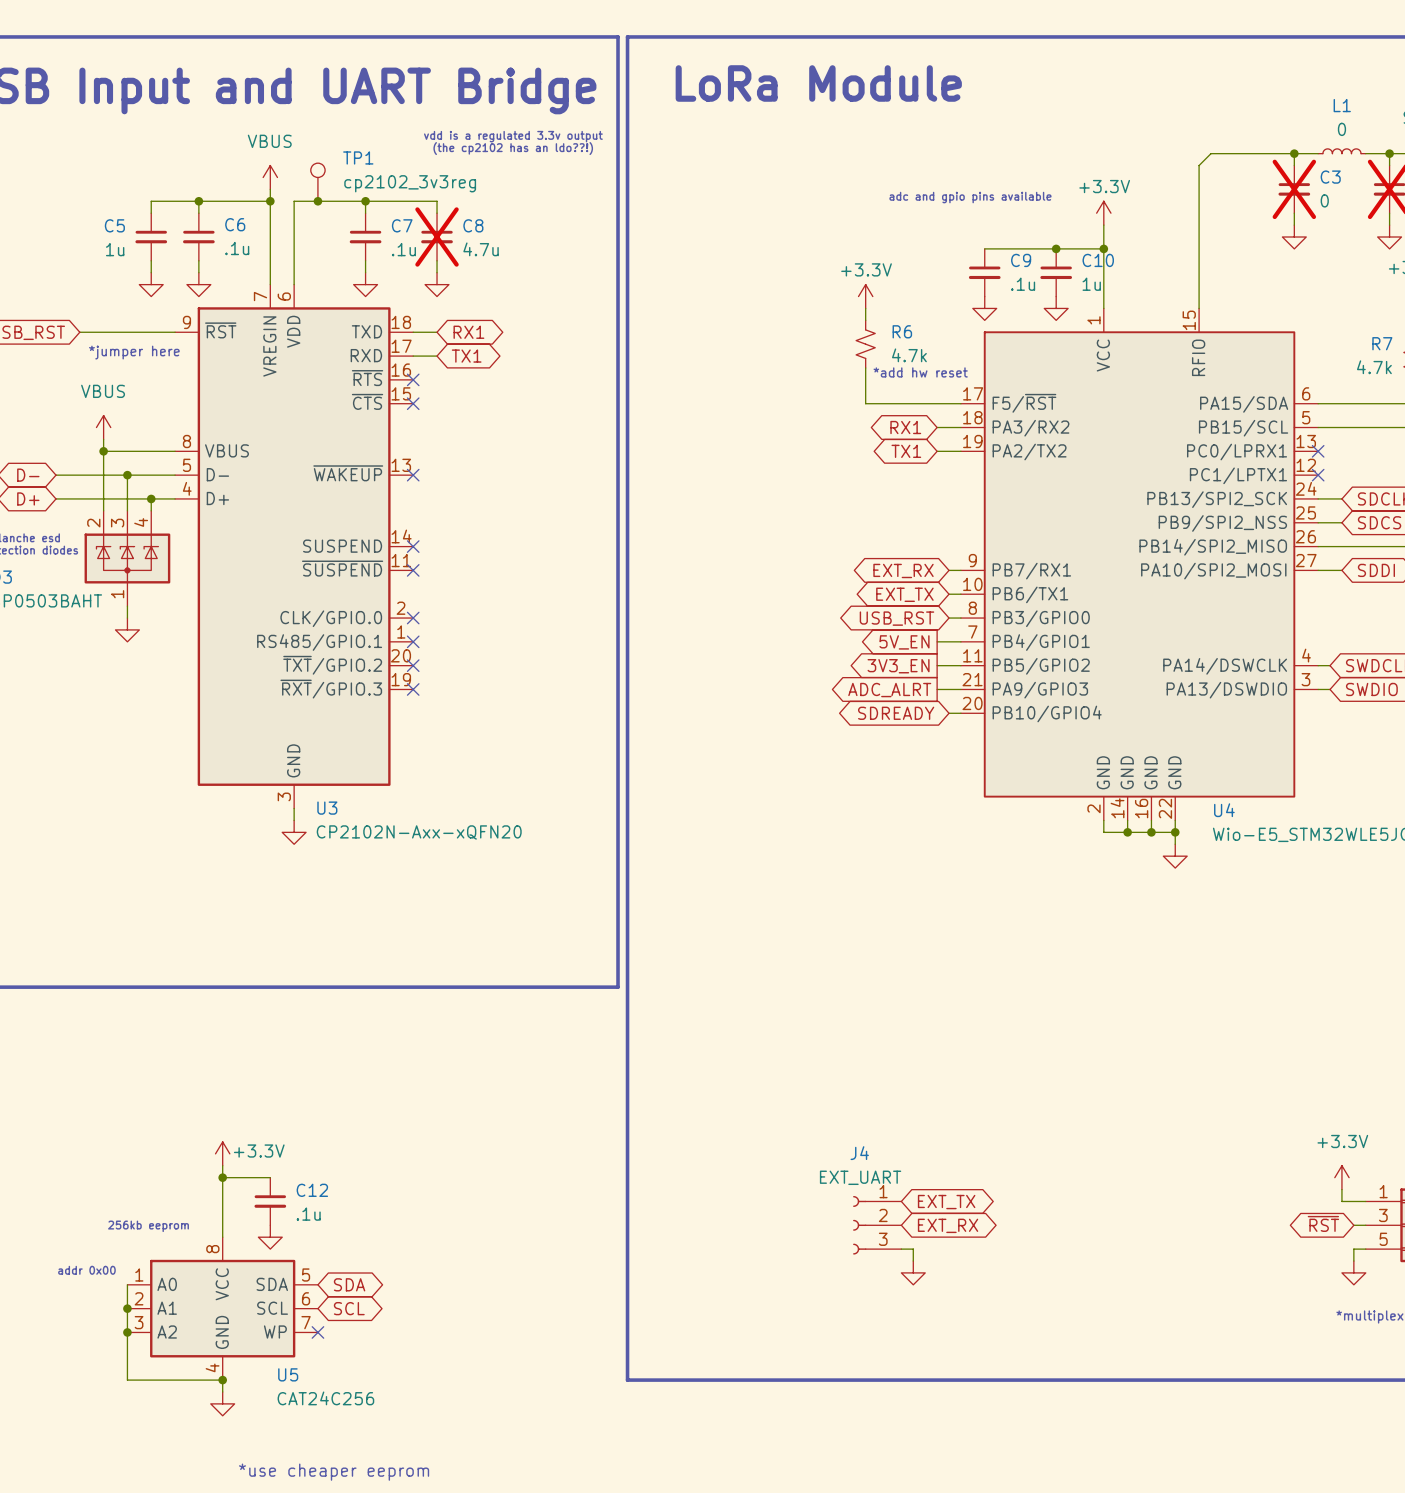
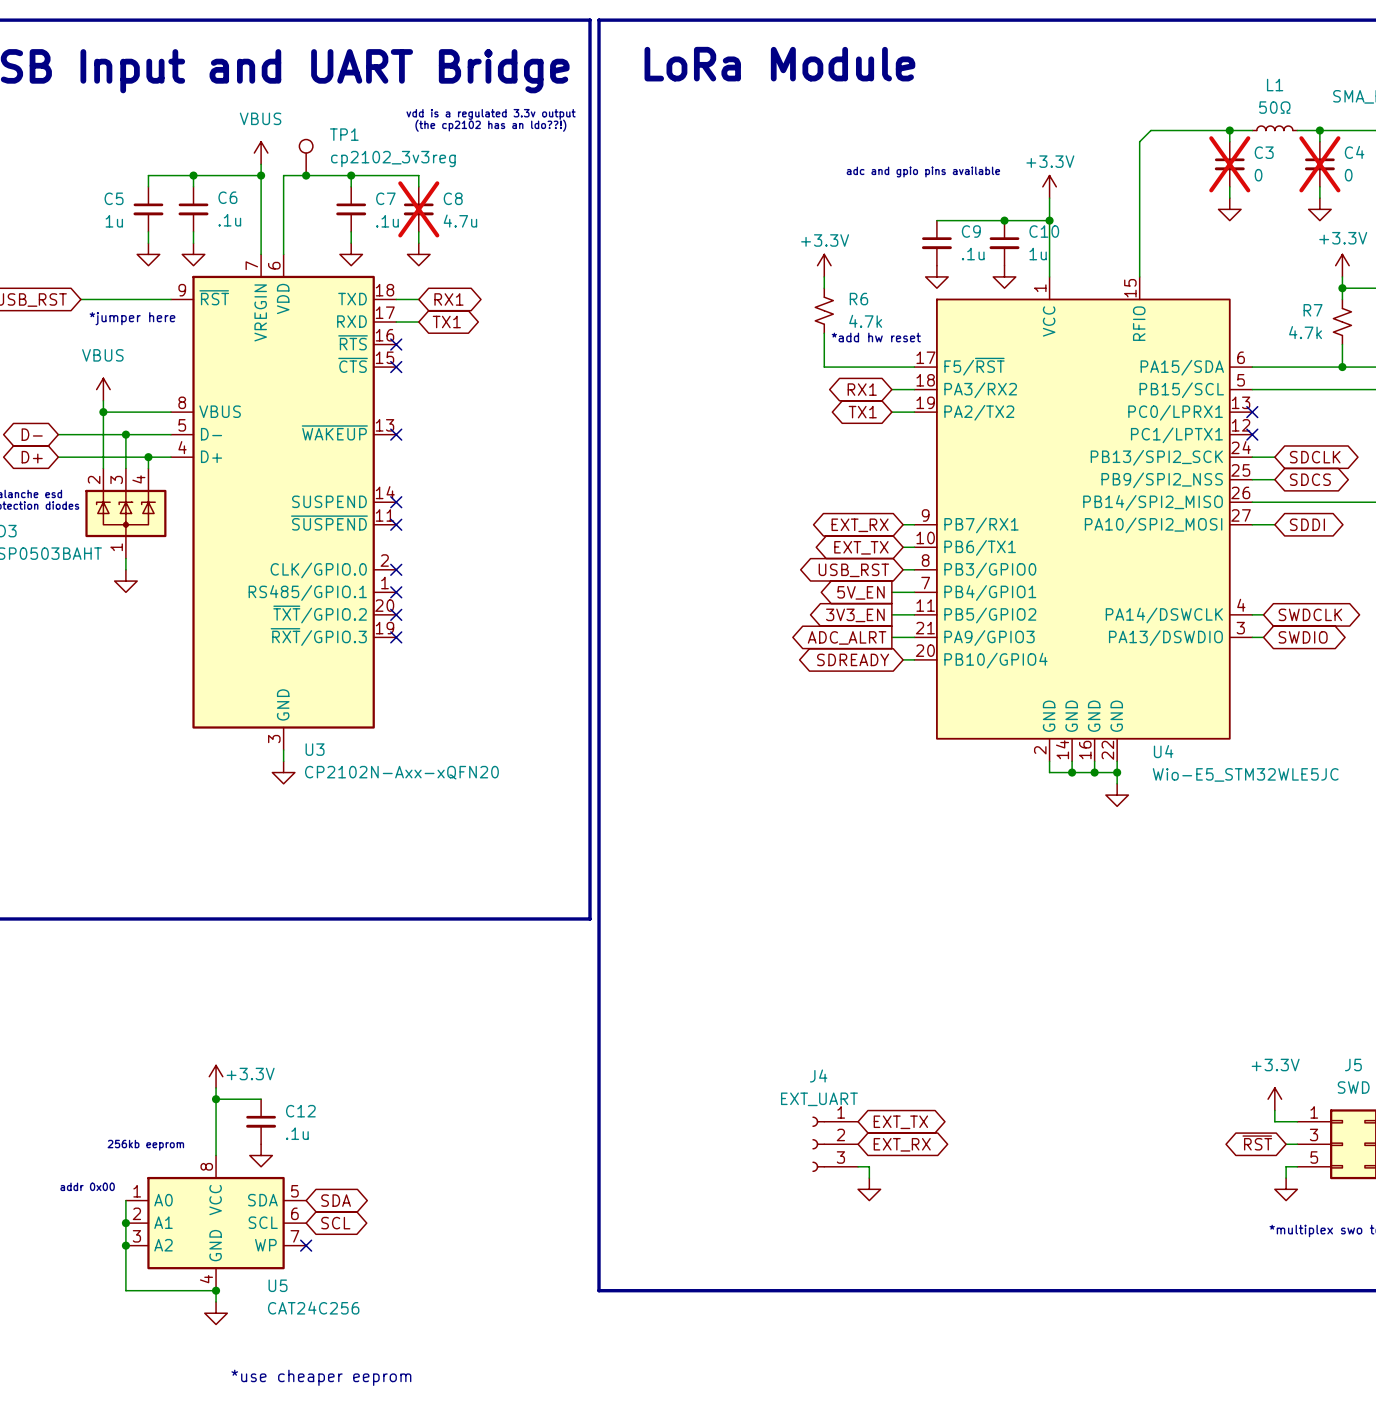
L1 value: 0 (1341, 129) -> 50Ω (1274, 107)

